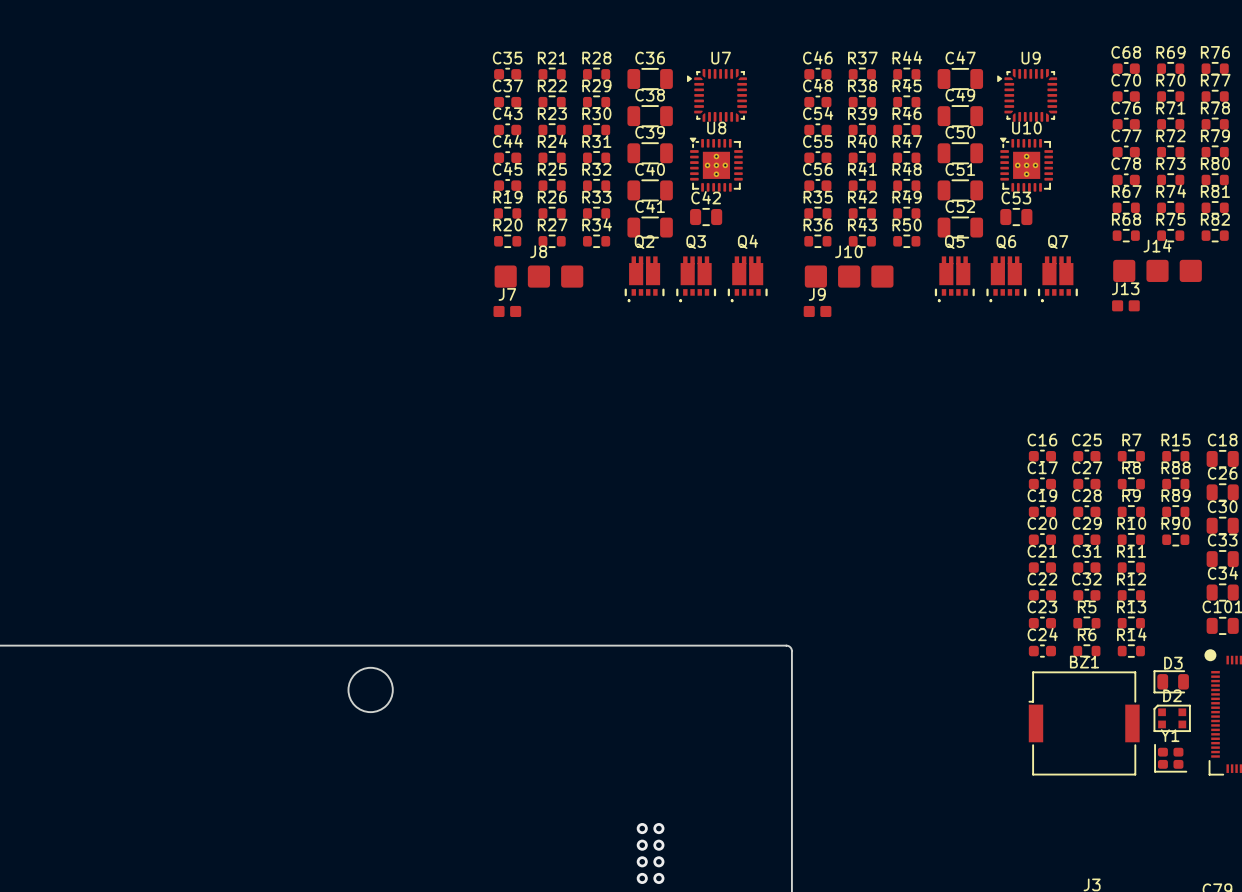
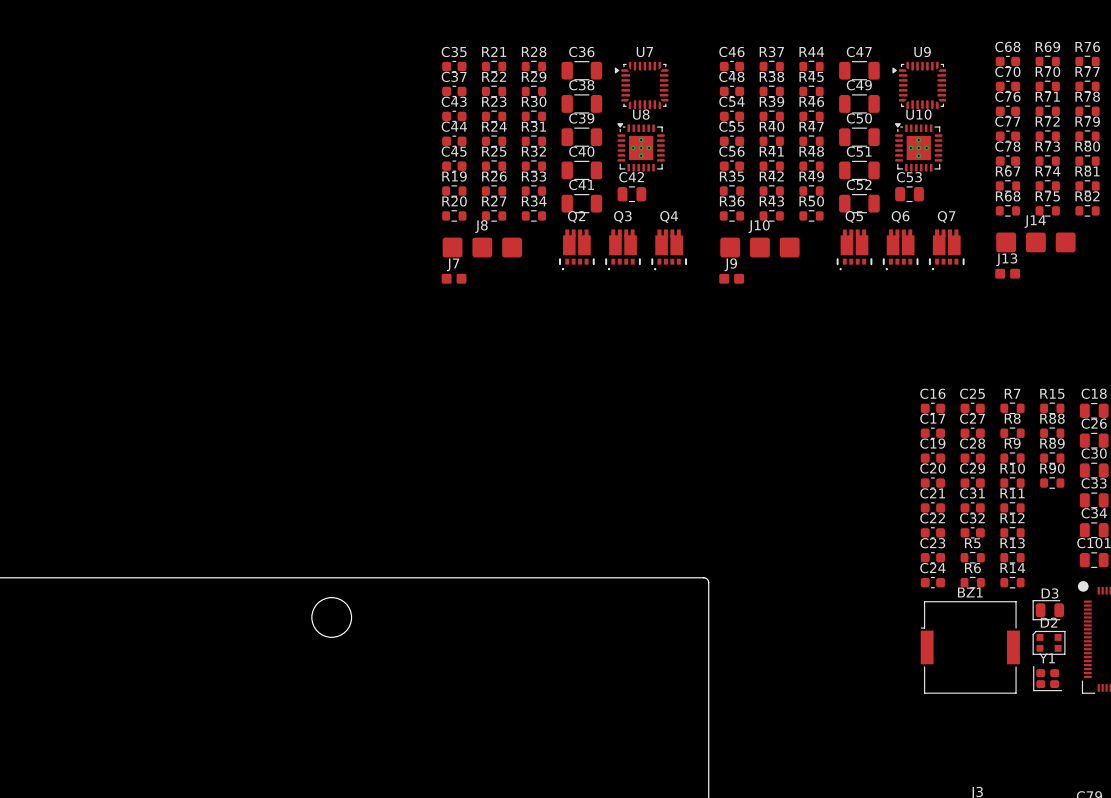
via: (642, 828) -> none
via: (658, 828) -> none
via: (642, 845) -> none
via: (658, 845) -> none
via: (642, 861) -> none
via: (658, 861) -> none
via: (642, 878) -> none
via: (658, 878) -> none

